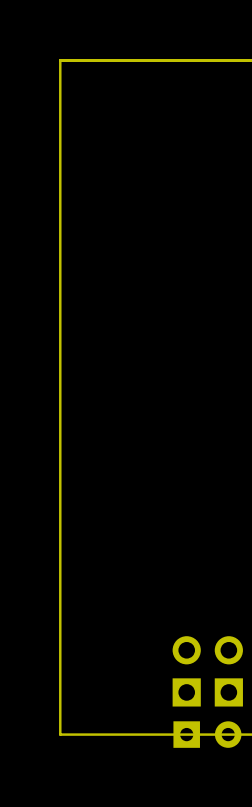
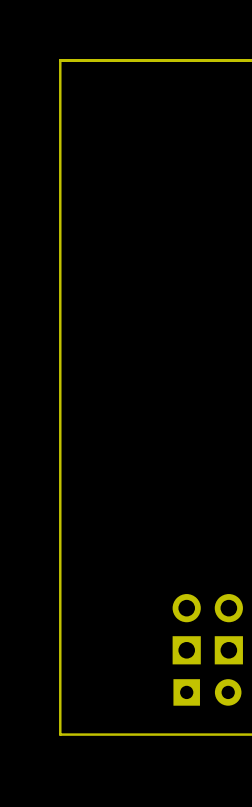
part: none -> (186, 629)
part: none -> (228, 629)
part: (186, 671) -> none
part: (228, 671) -> none
part position: (207, 734) -> (207, 692)

